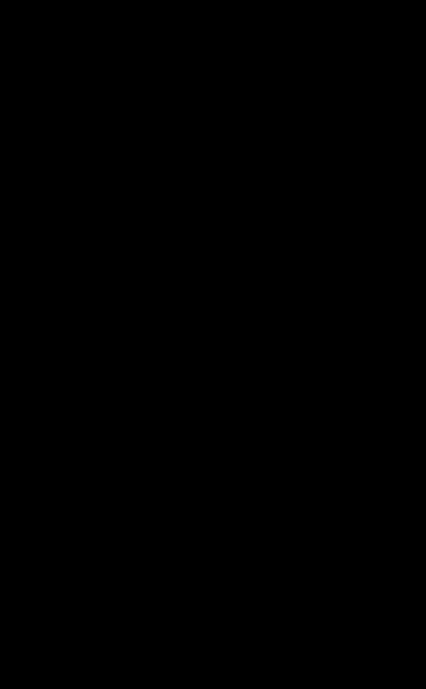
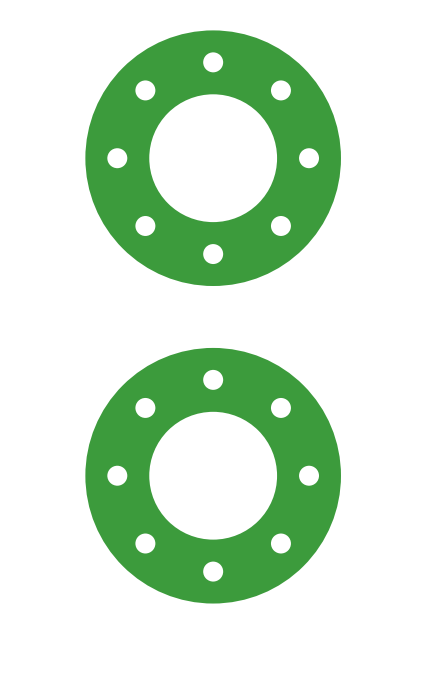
part: none -> (213, 158)
part: none -> (213, 475)

